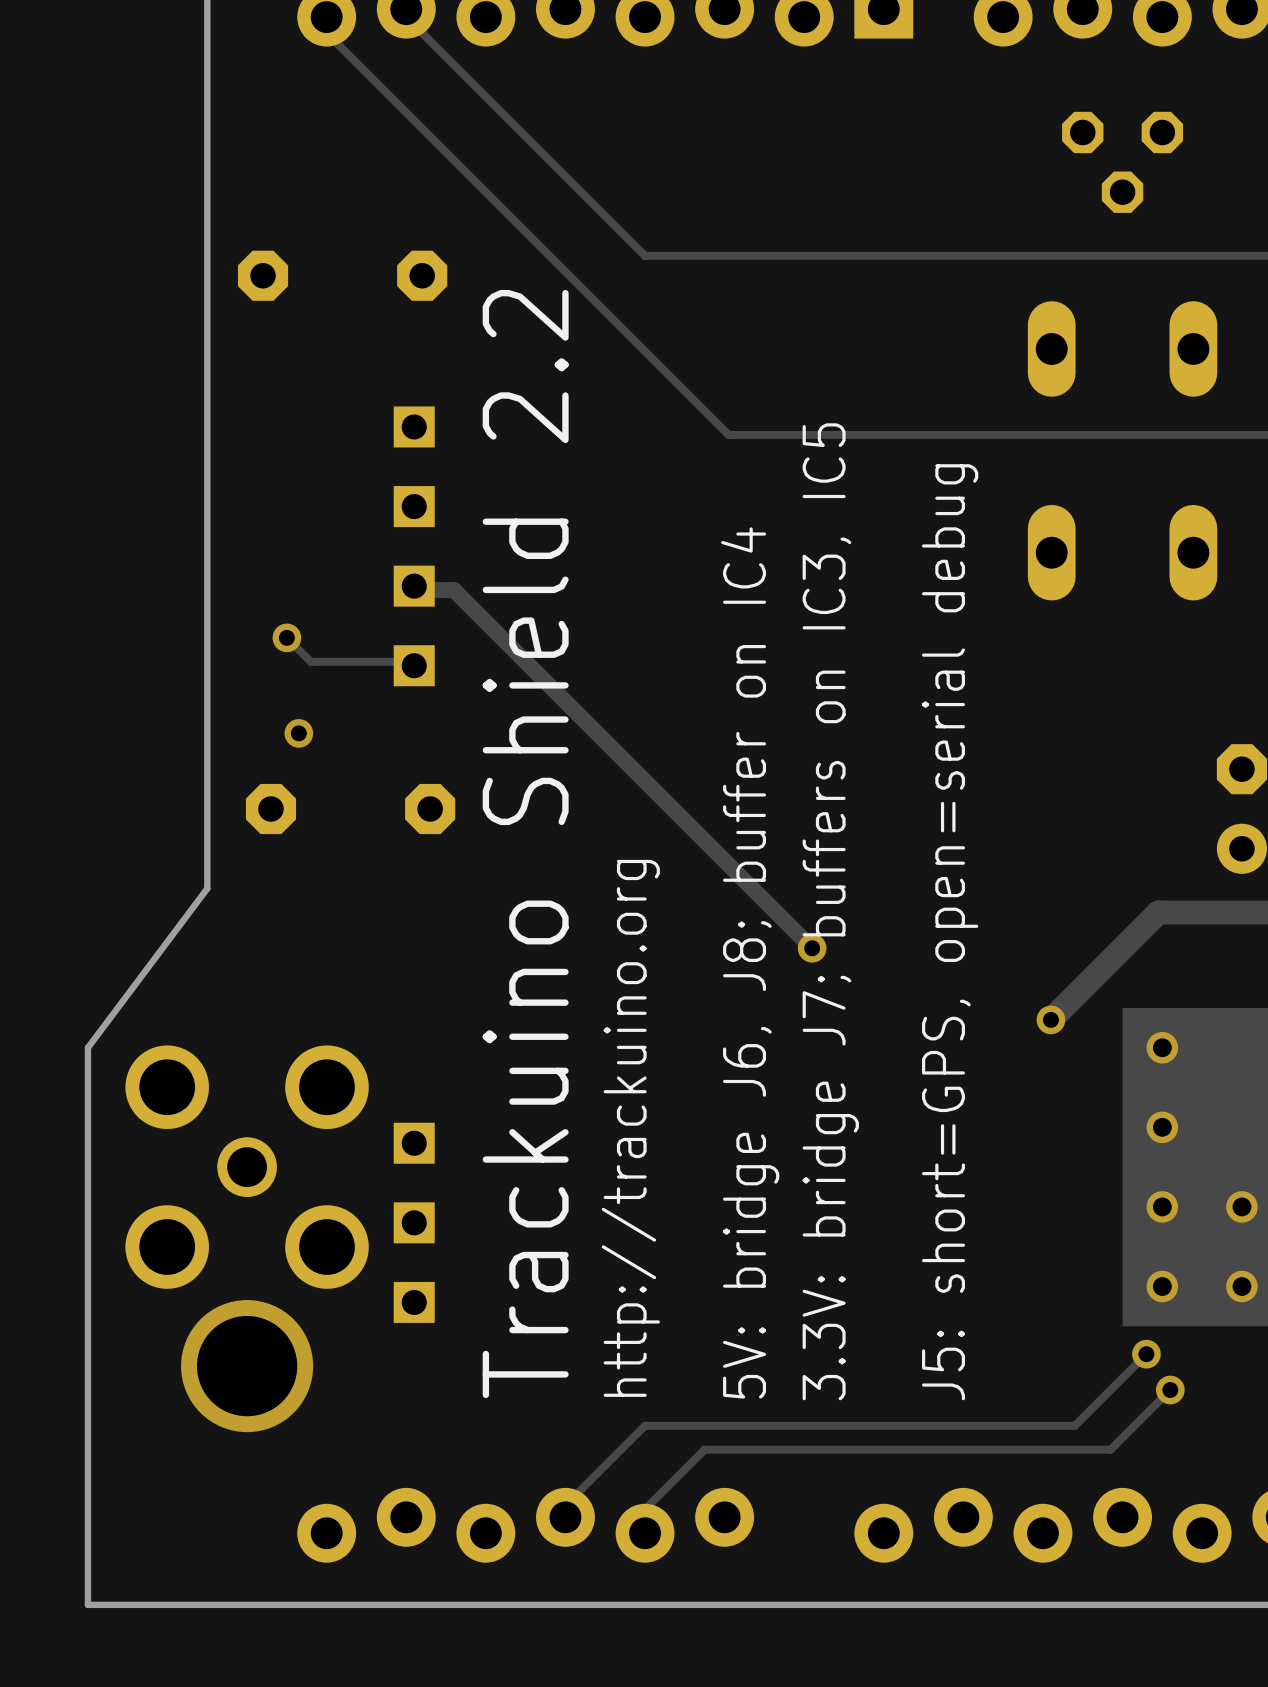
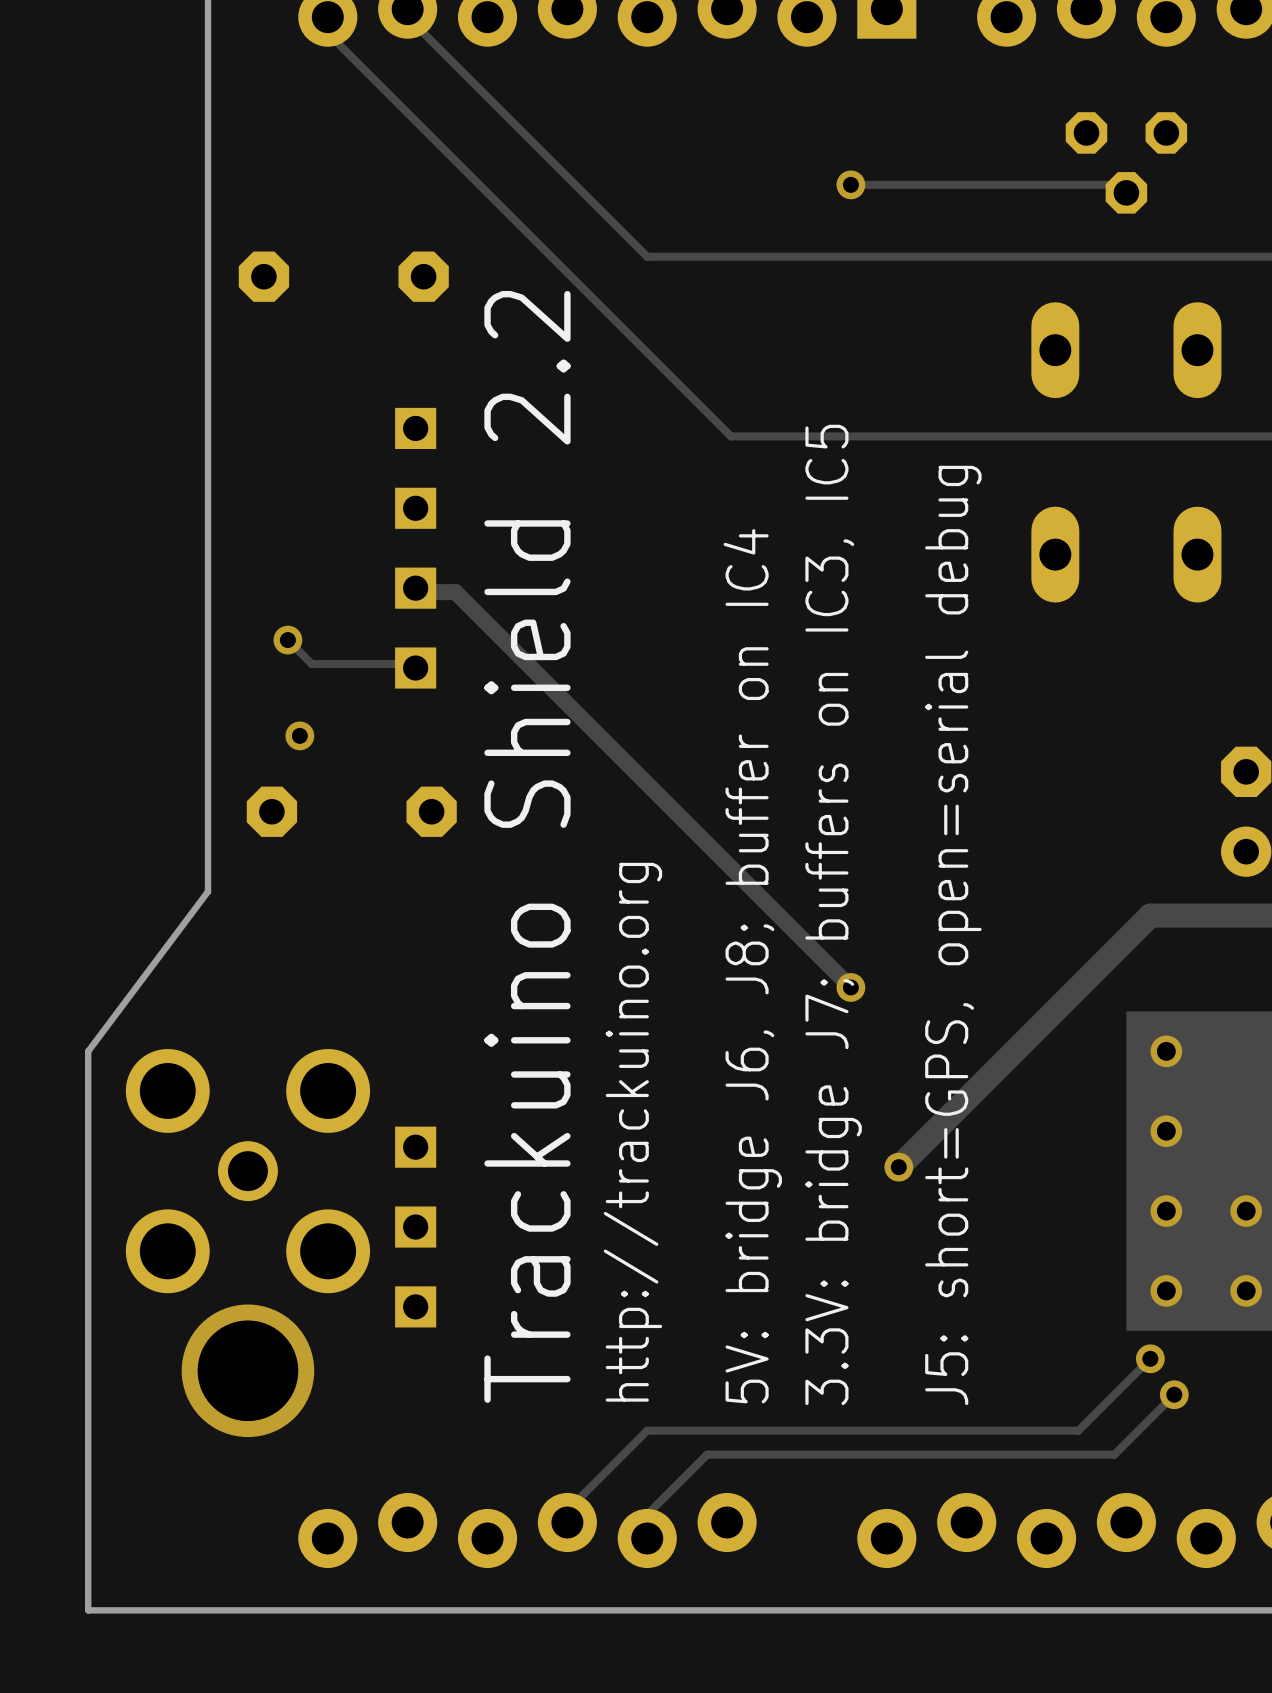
track: none -> (850, 184) (1126, 184) (1126, 192)
via: none -> (850, 184)
track: (1158, 912) (1050, 1019) -> (1162, 915) (1150, 915) (898, 1167)
track: none -> (814, 951) (850, 987)
via position: (812, 948) -> (850, 987)
via: (1050, 1019) -> none
via: none -> (898, 1167)

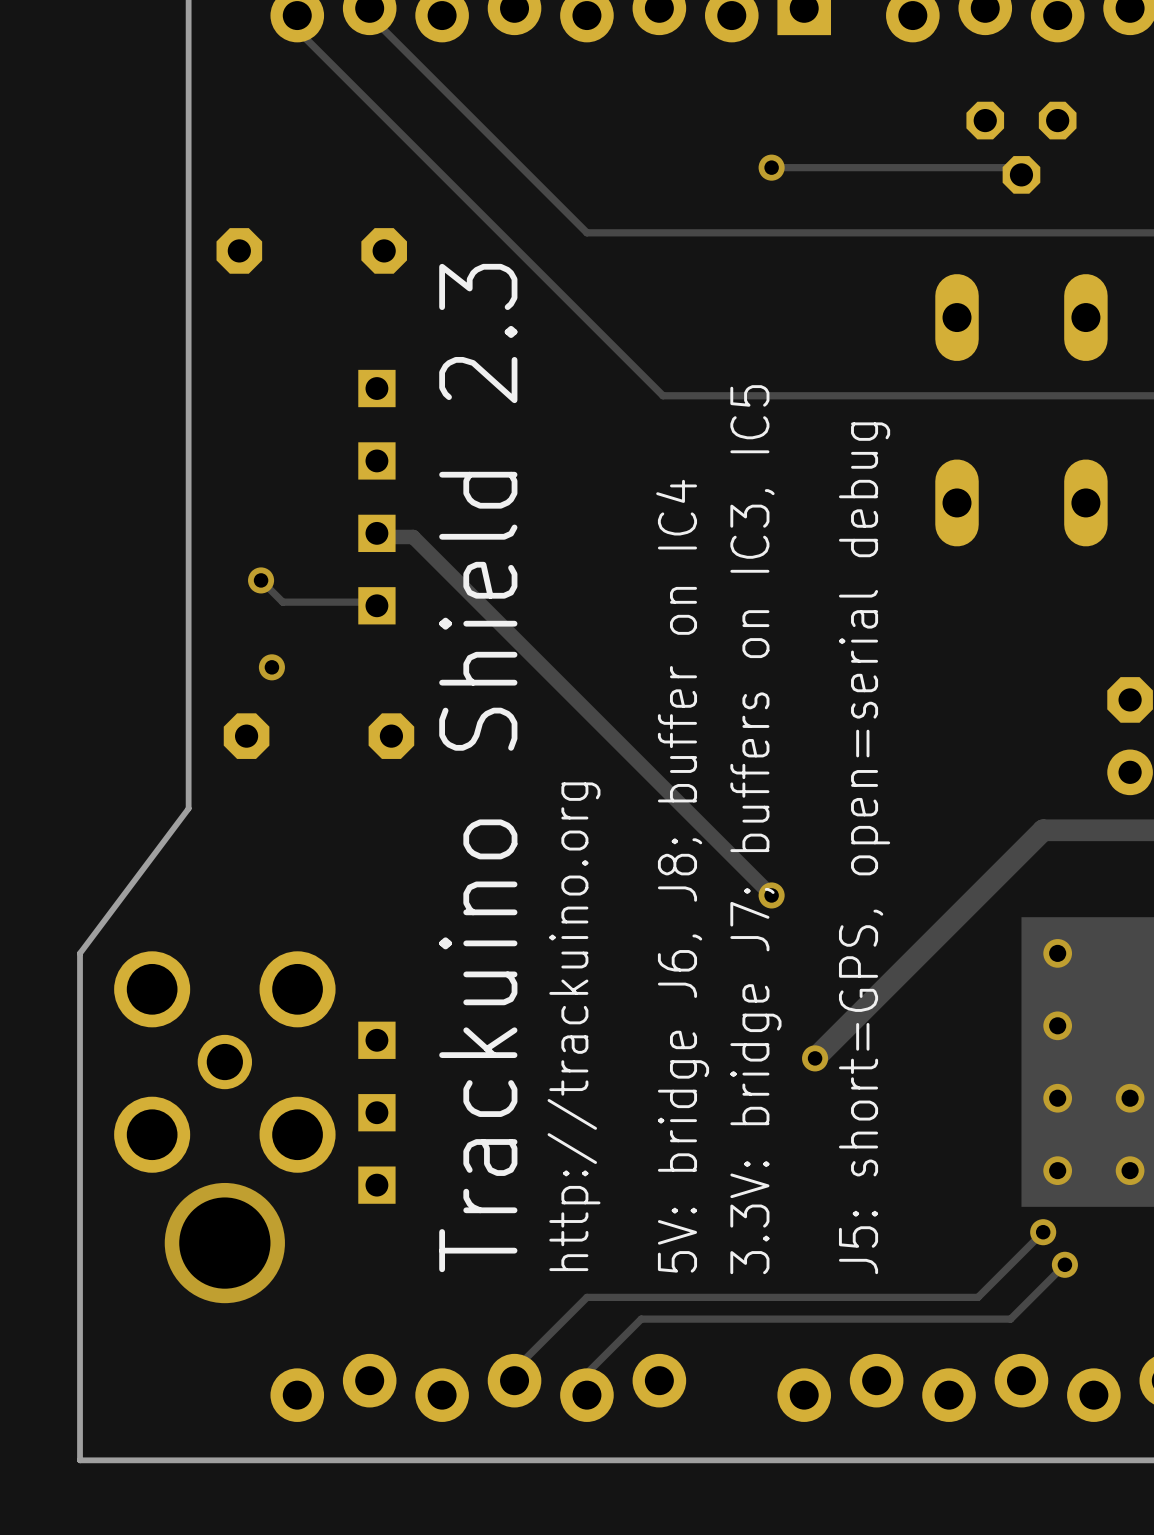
text: Trackuino Shield 2.2 (527, 846) -> Trackuino Shield 2.3 (478, 768)

